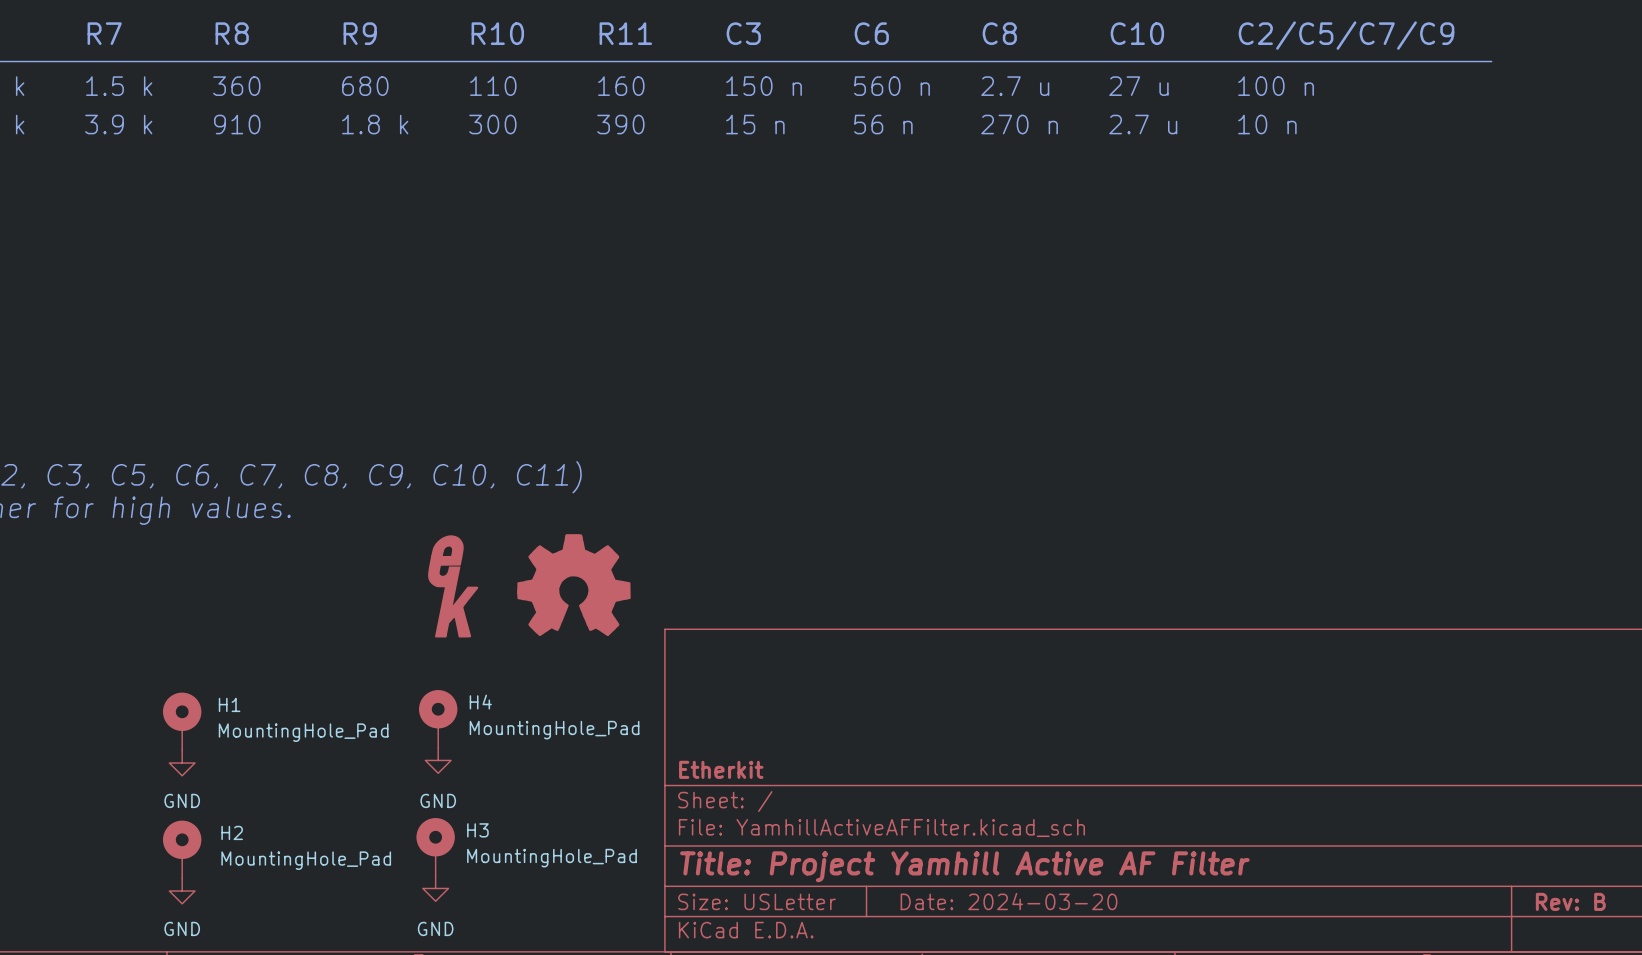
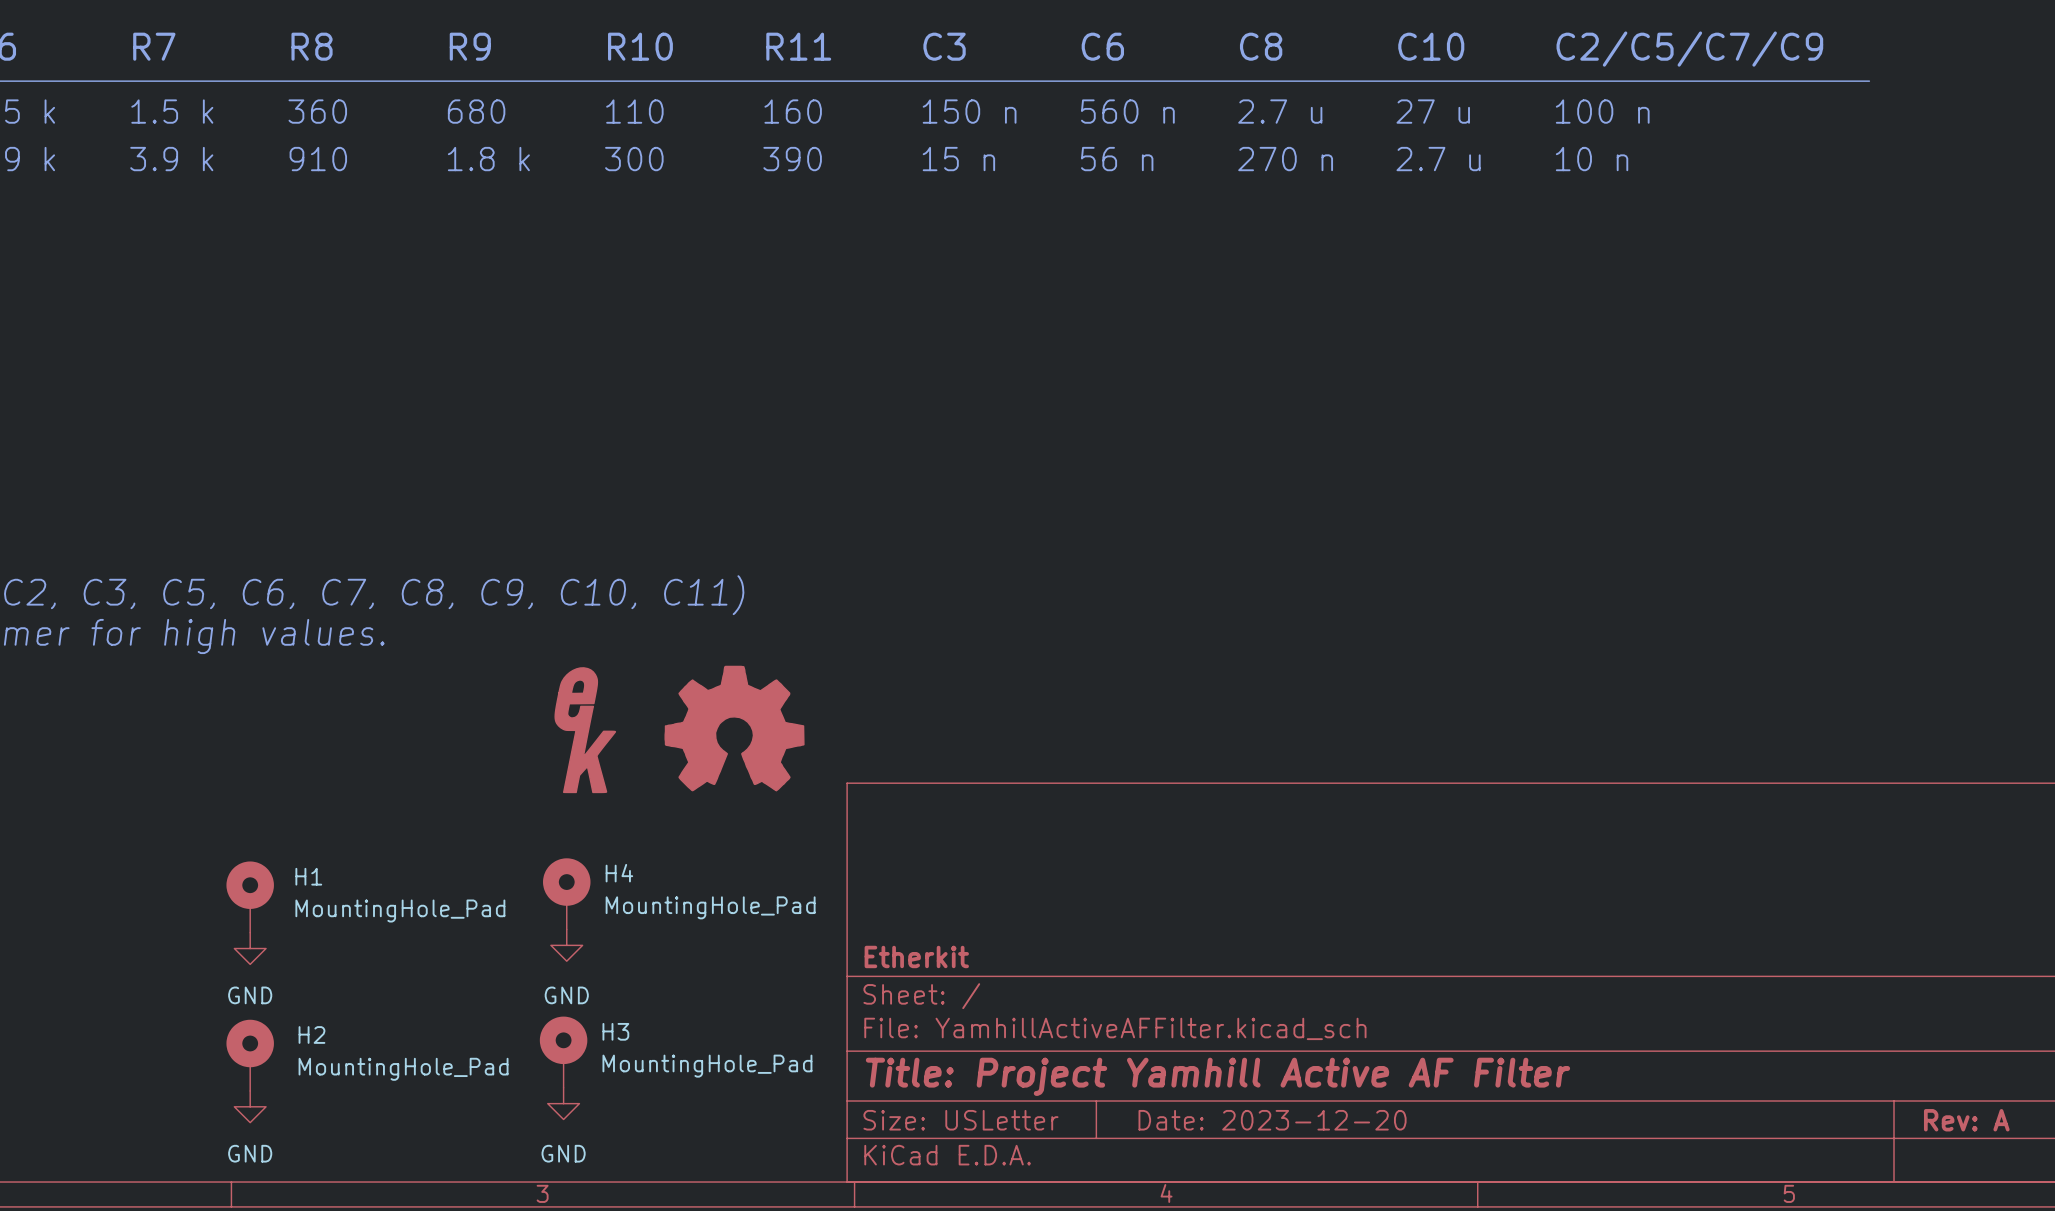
title block: Date: 2024-03-20 (1009, 901) -> Date: 2023-12-20 (1272, 1120)
title block: Rev: B (1570, 901) -> Rev: A (1966, 1120)

